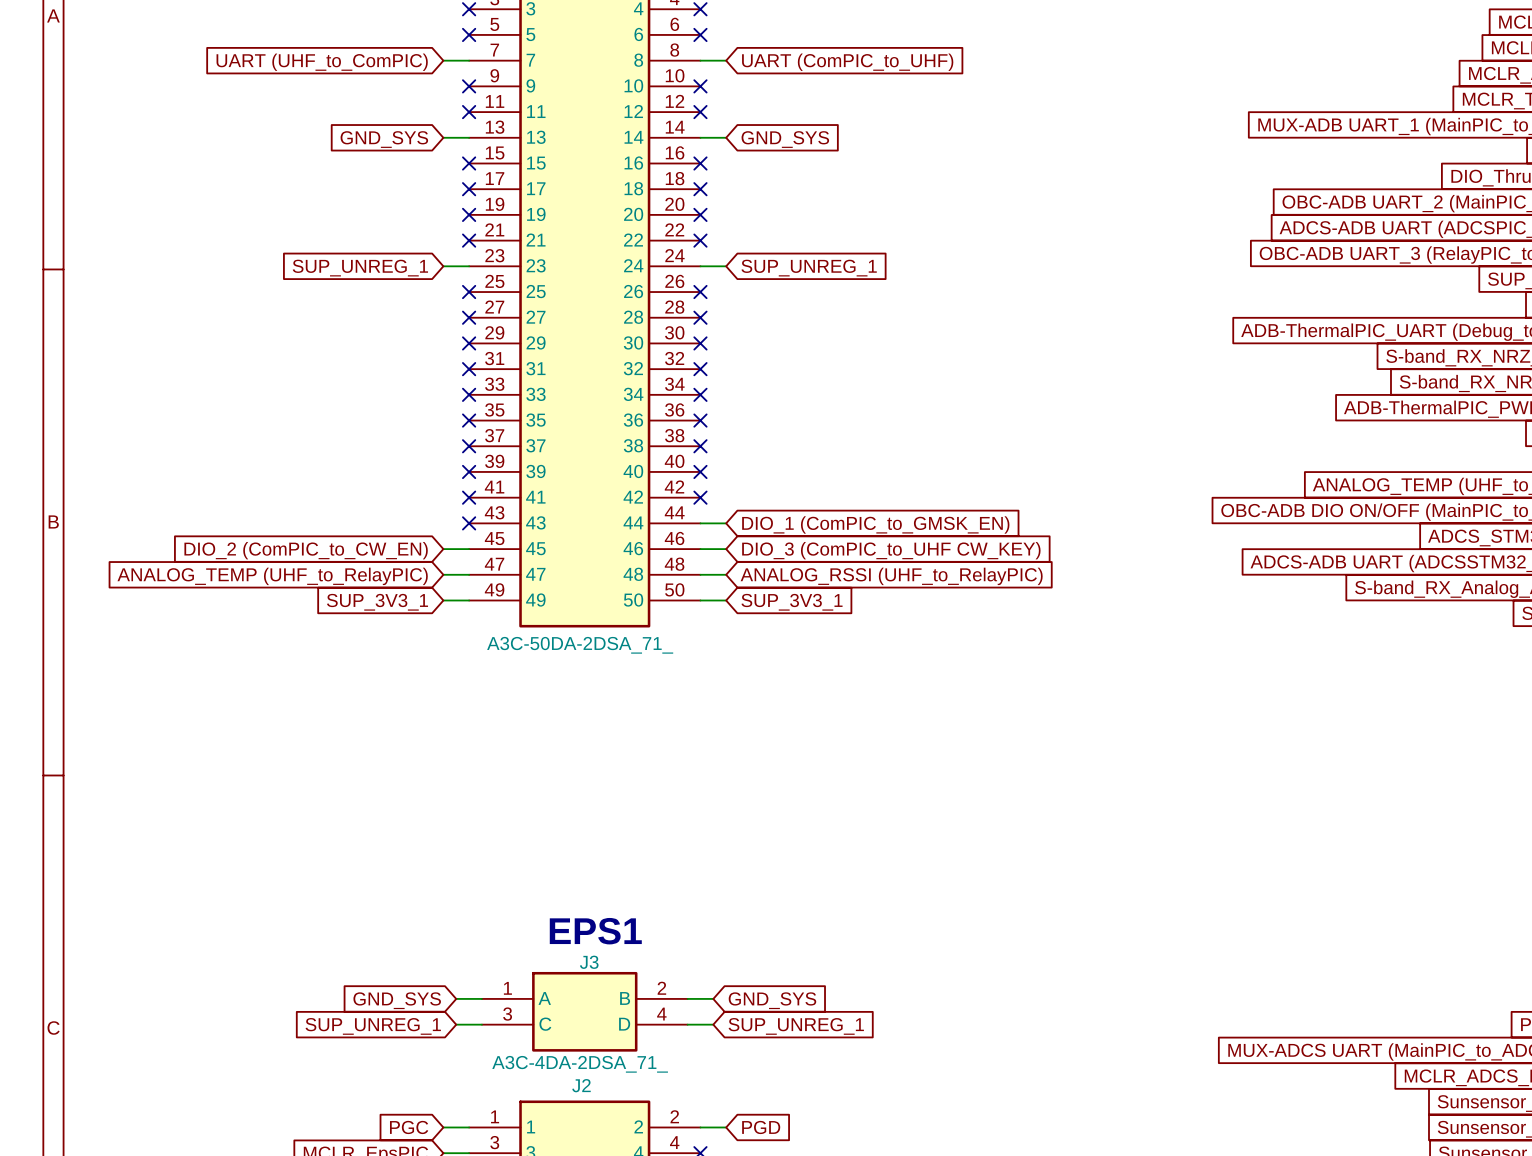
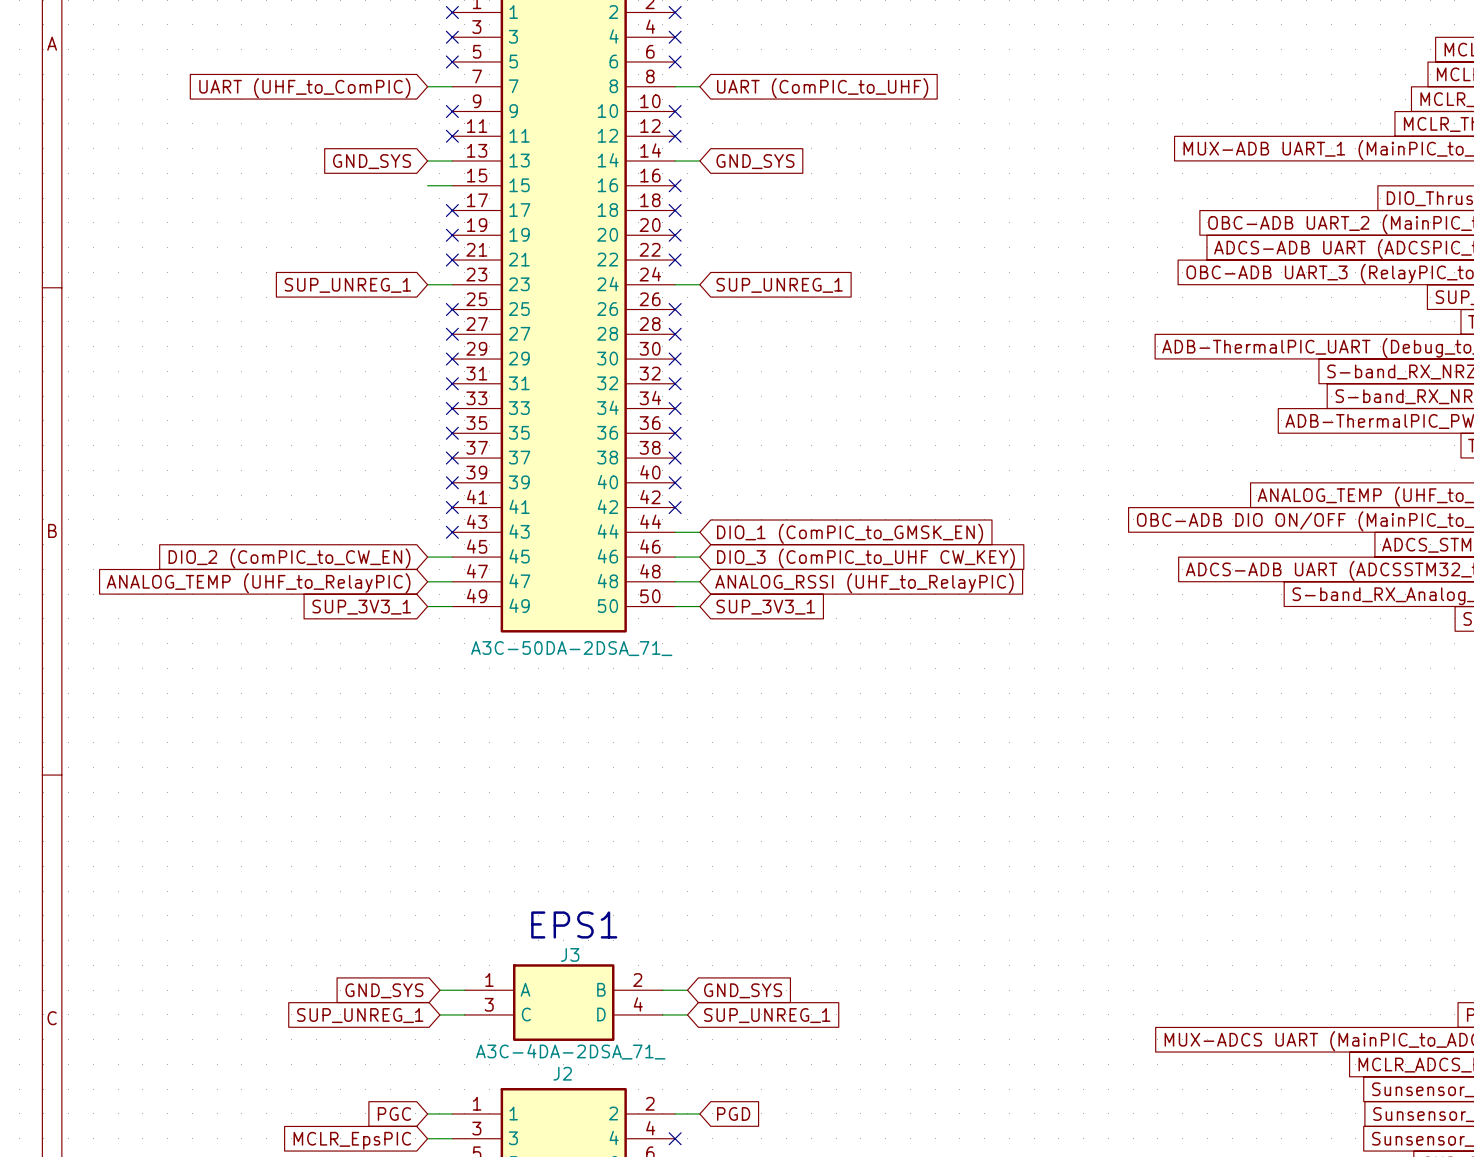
wire: none -> (427, 185) (452, 185)
no-connect mark: (469, 163) -> none

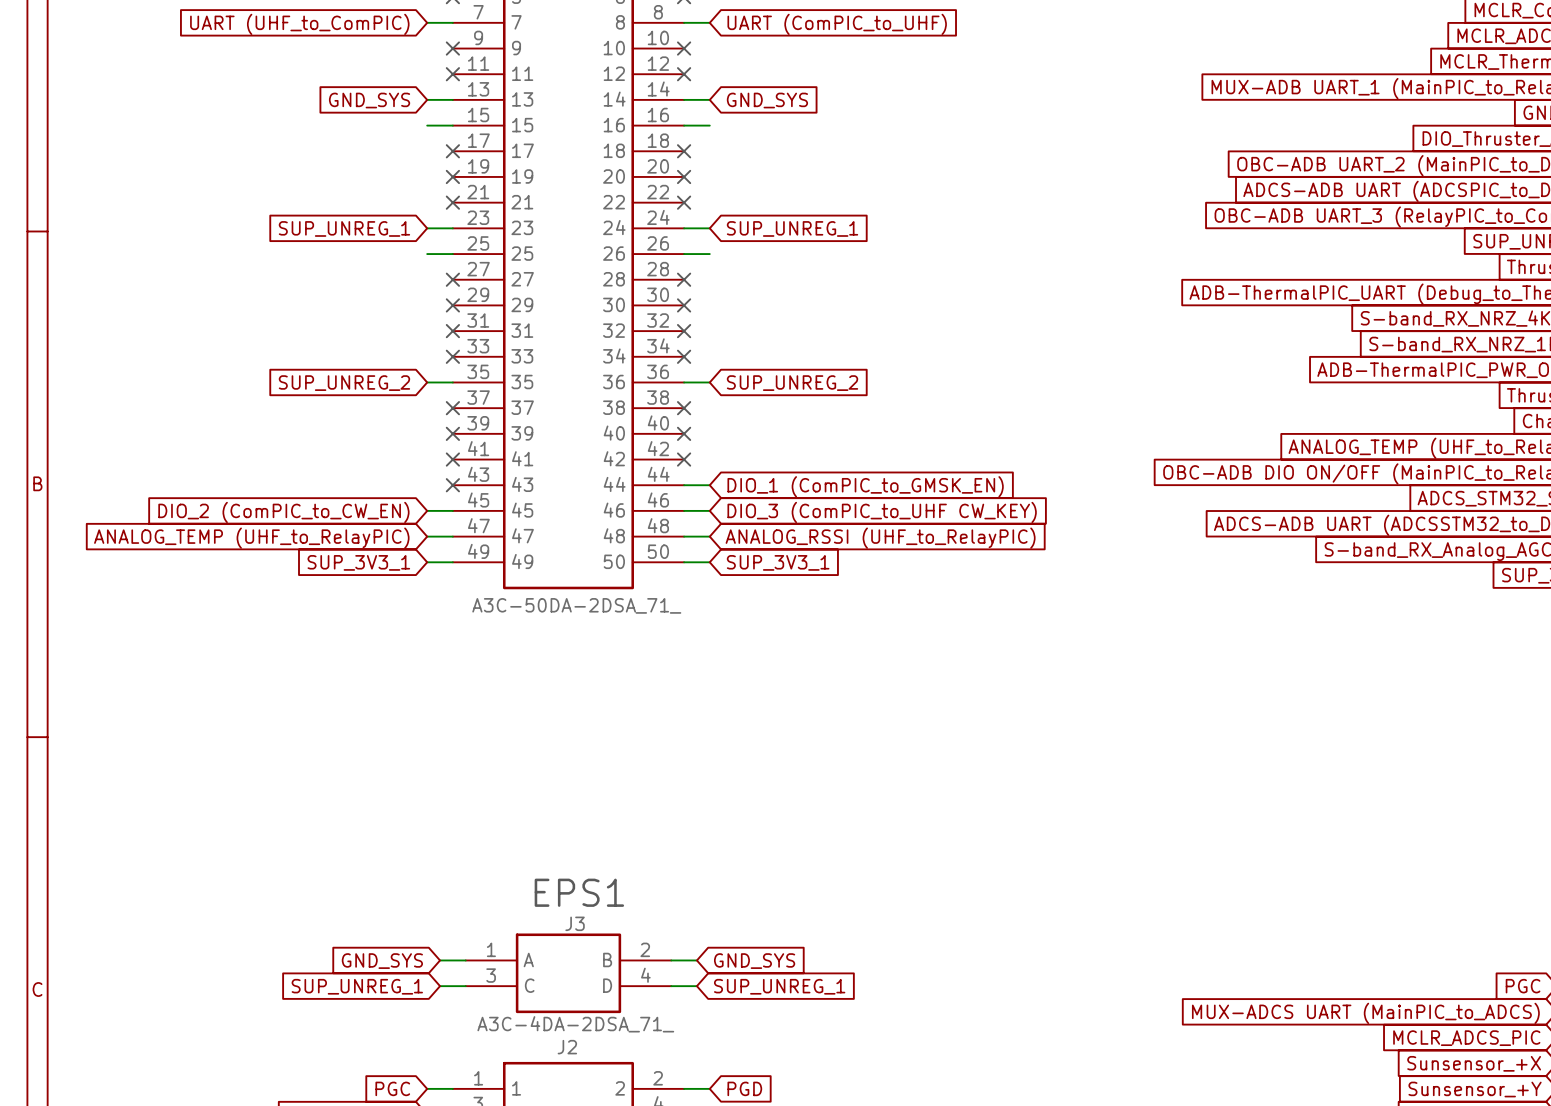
wire: none -> (684, 125) (709, 125)
no-connect mark: (675, 185) -> none
wire: none -> (427, 254) (452, 254)
no-connect mark: (452, 309) -> none
wire: none -> (684, 254) (709, 254)
no-connect mark: (675, 309) -> none
global label: none -> SUP_UNREG_2 (344, 383)
wire: none -> (427, 382) (452, 382)
no-connect mark: (452, 433) -> none
wire: none -> (684, 382) (709, 382)
no-connect mark: (675, 433) -> none
global label: none -> SUP_UNREG_2 (792, 383)

